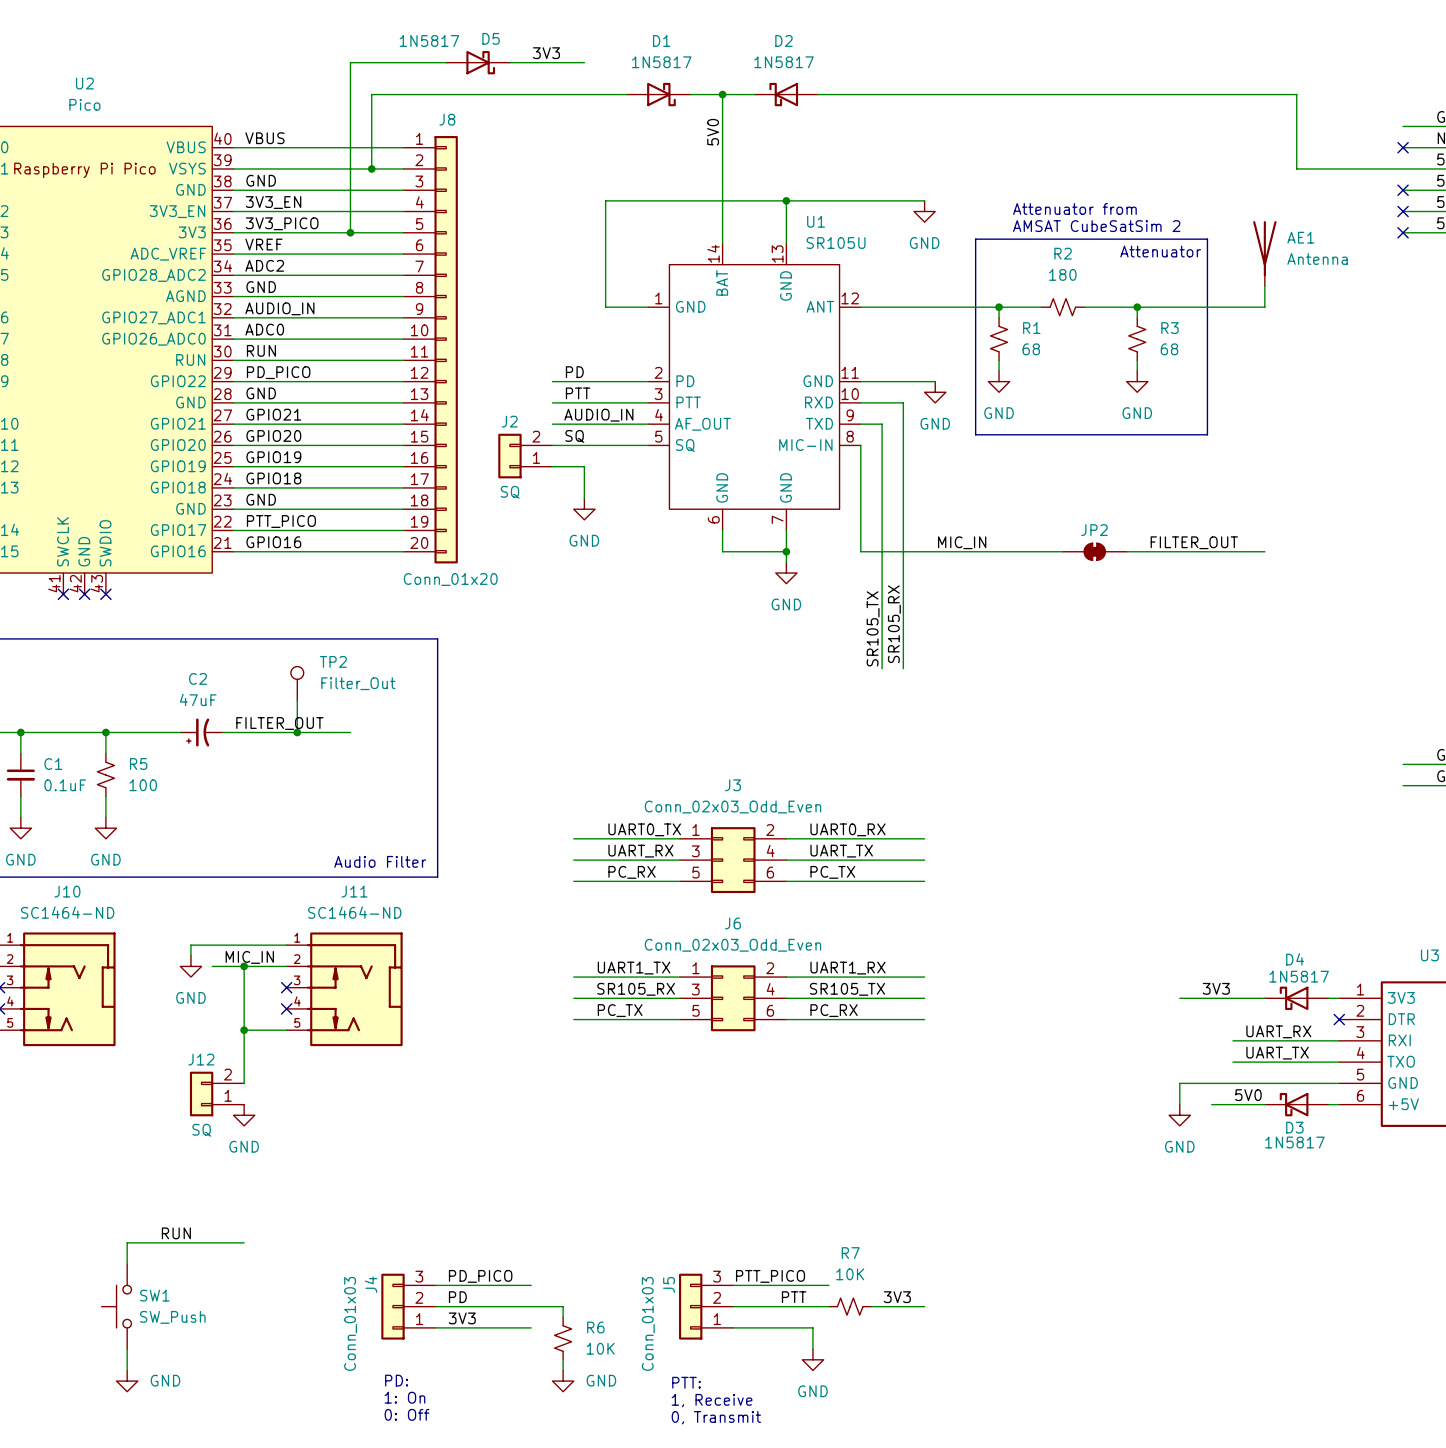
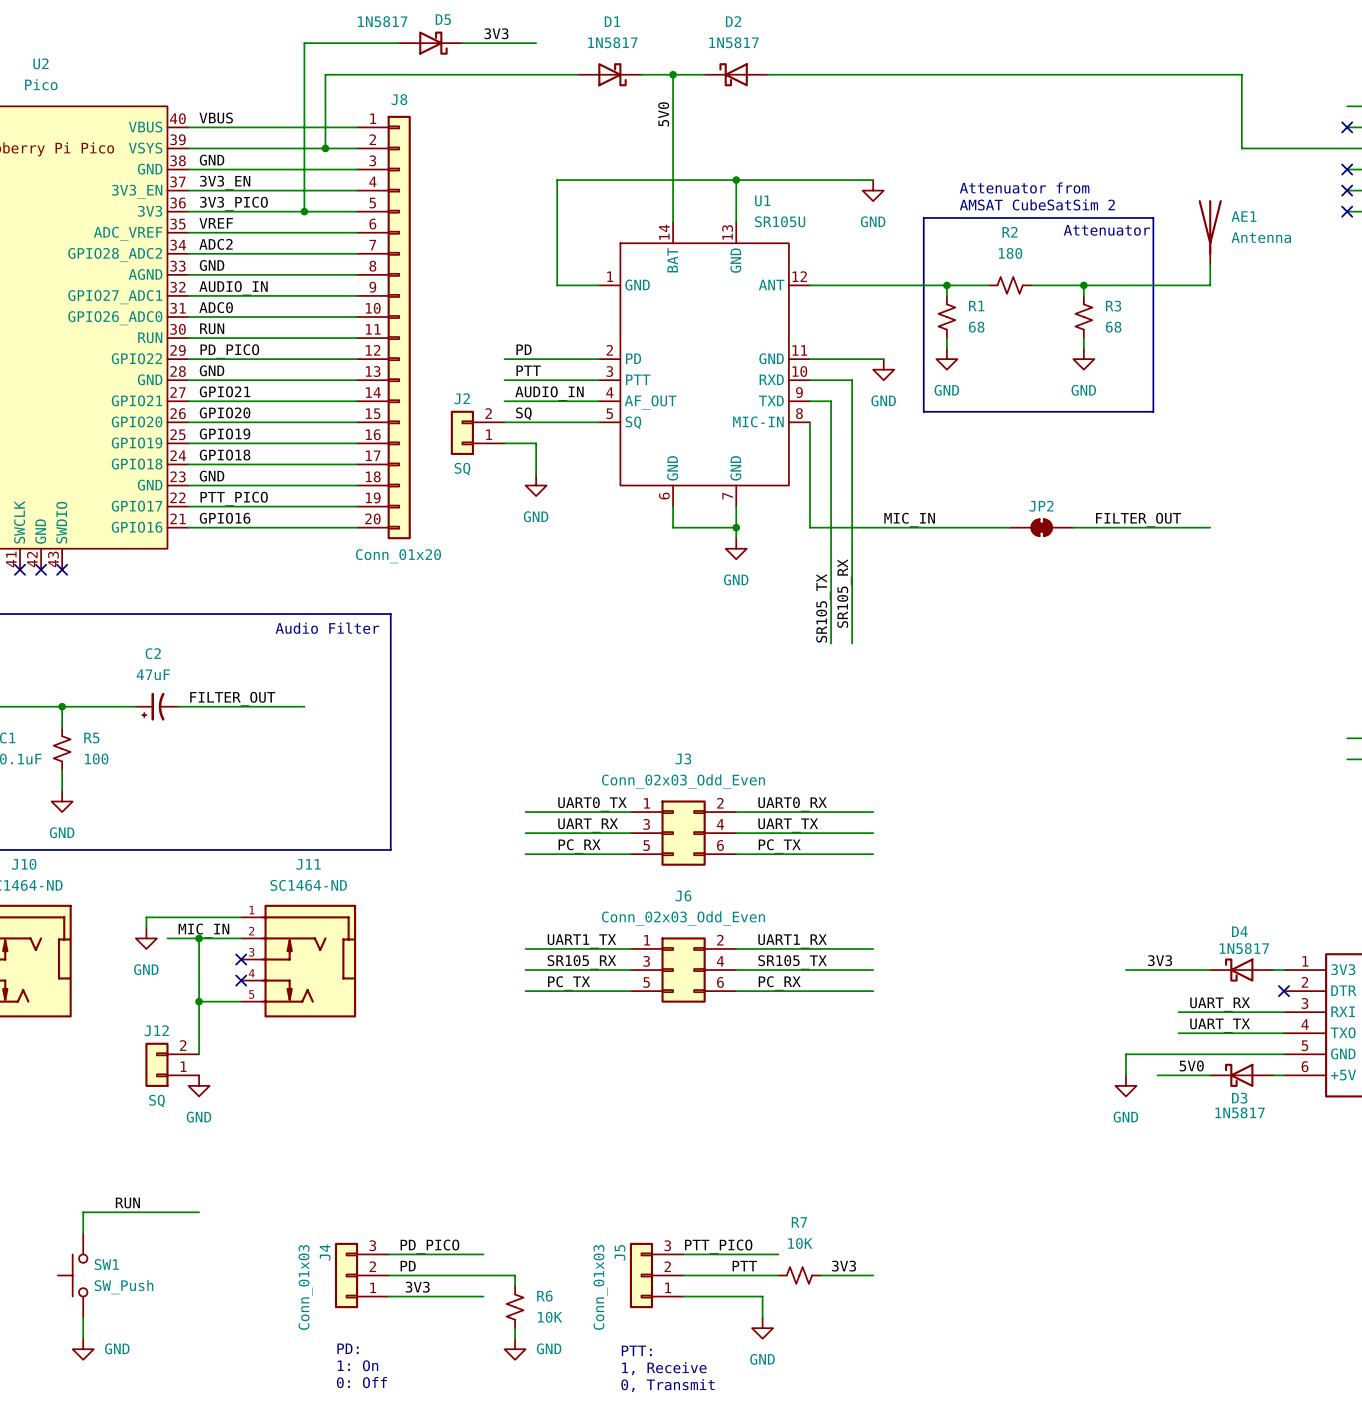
TP2: Filter_Out (297, 683) -> none
wire: (297, 700) (297, 732) -> none
junction: (297, 732) -> none
text position: Audio Filter (380, 861) -> Audio Filter (327, 628)

